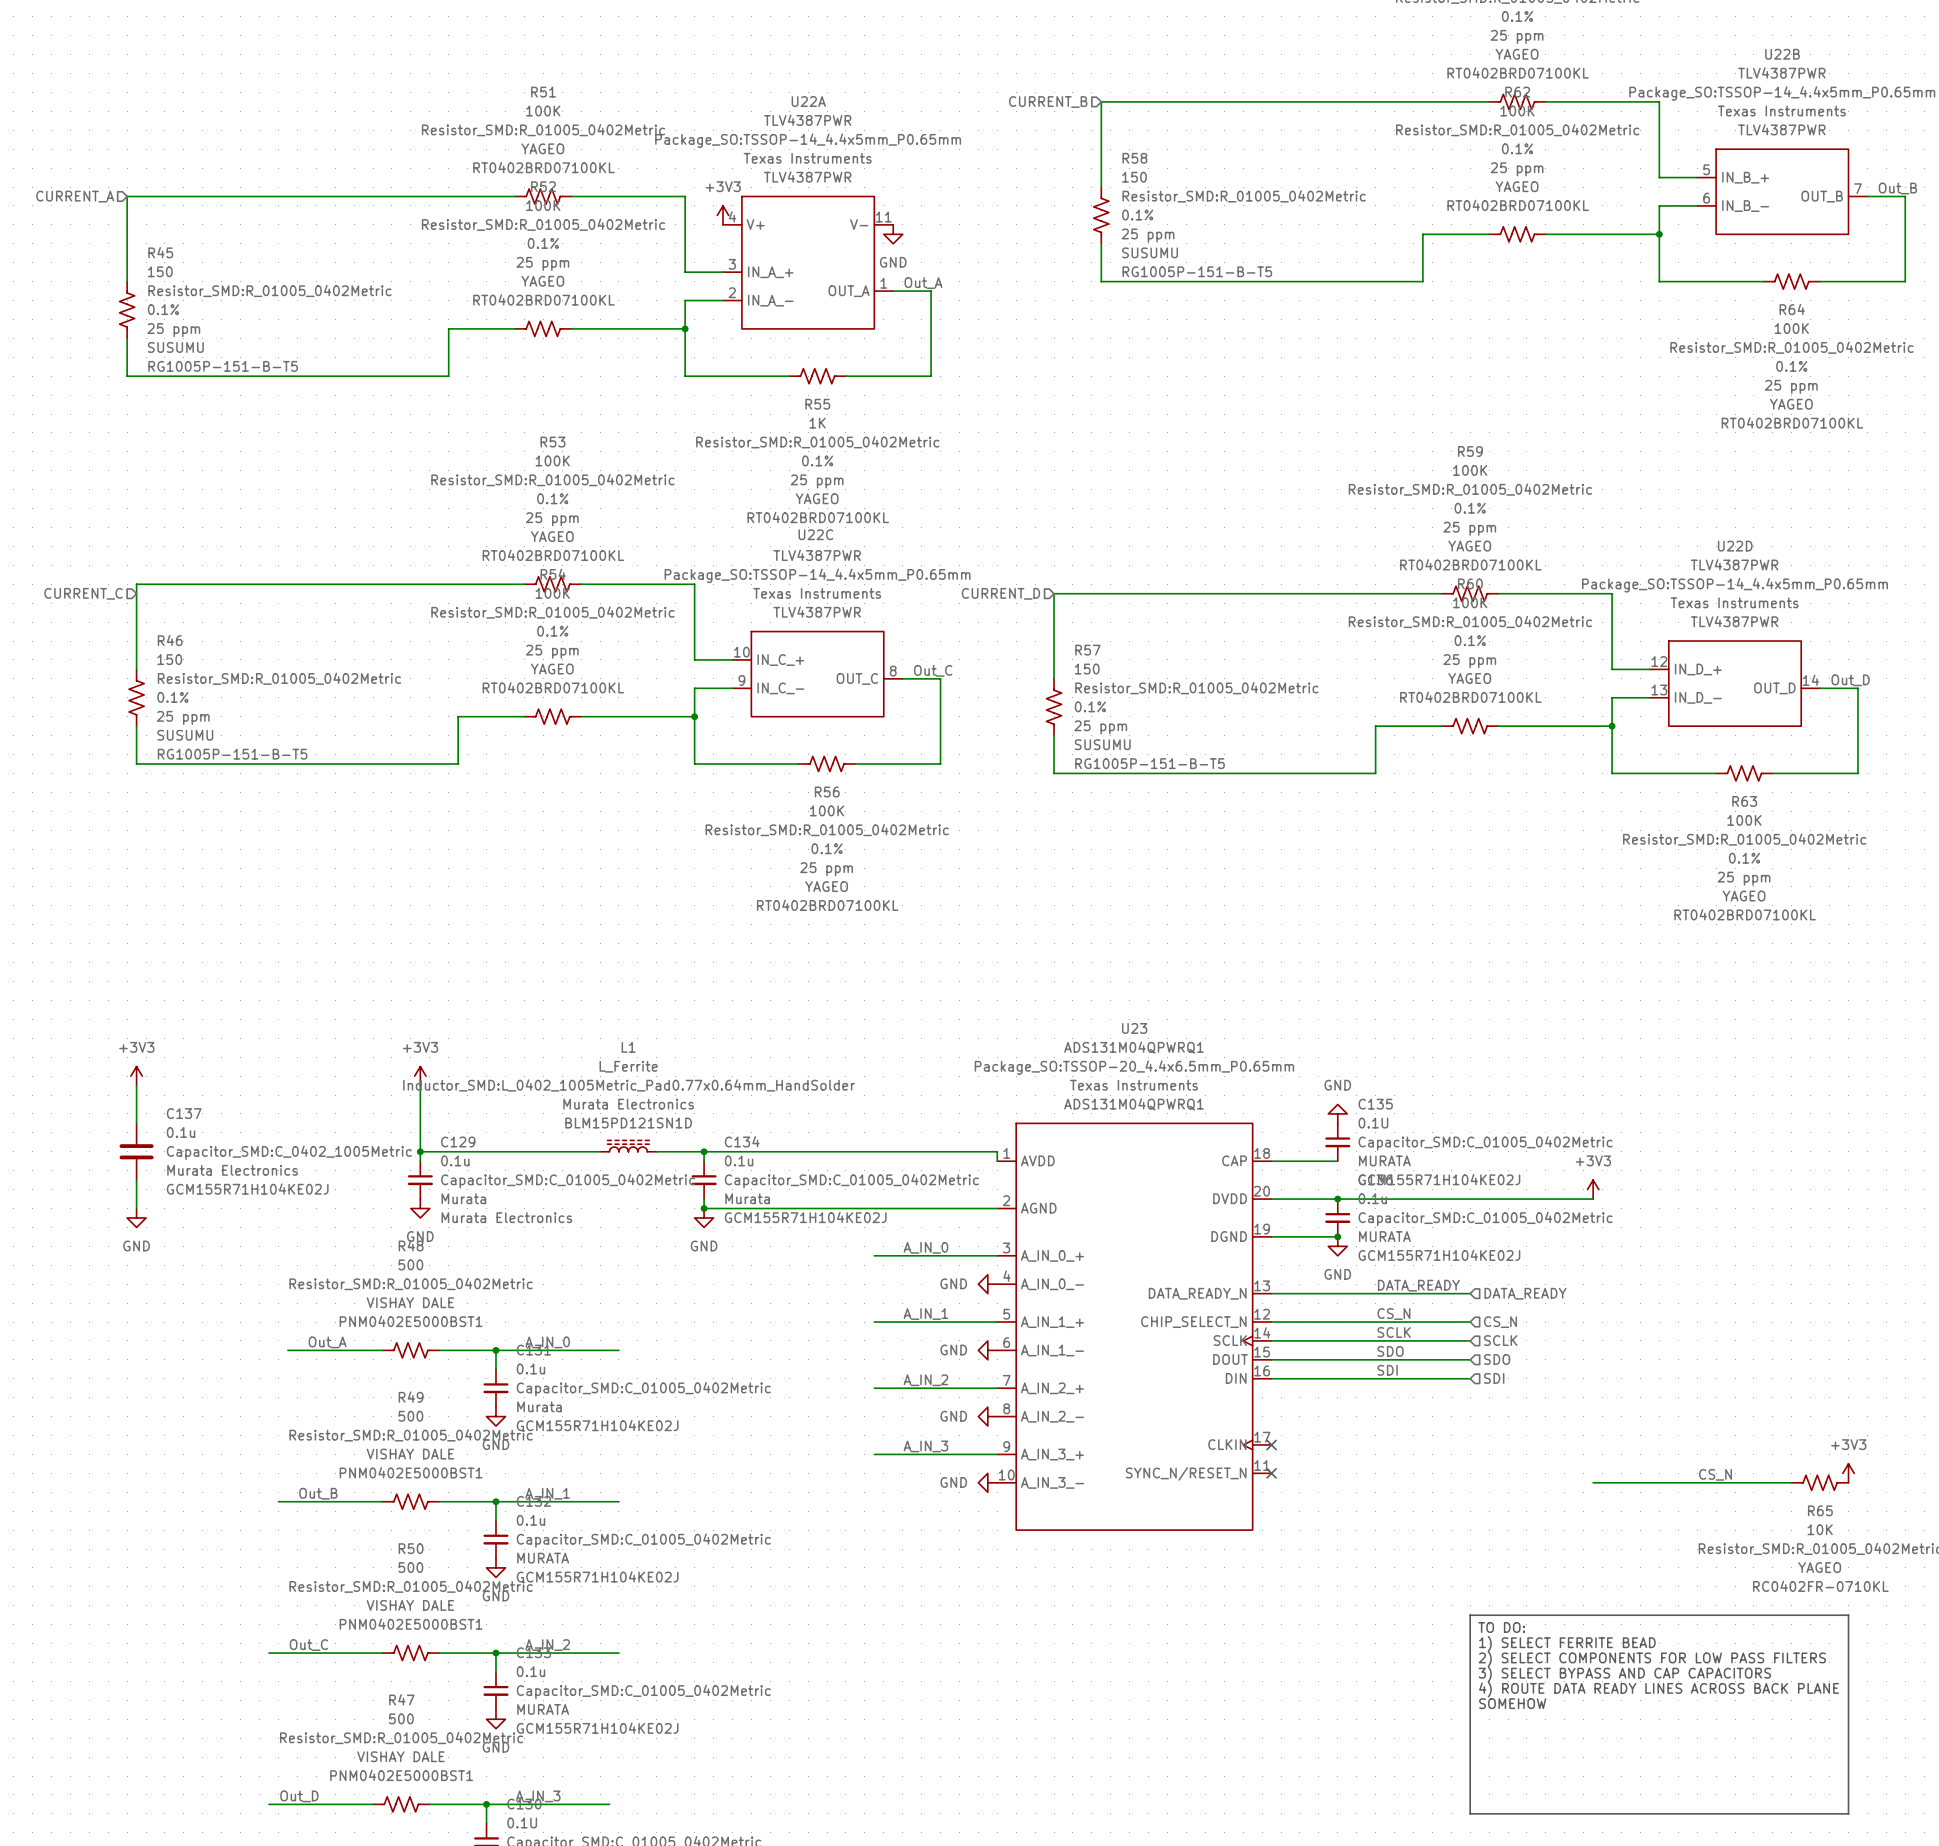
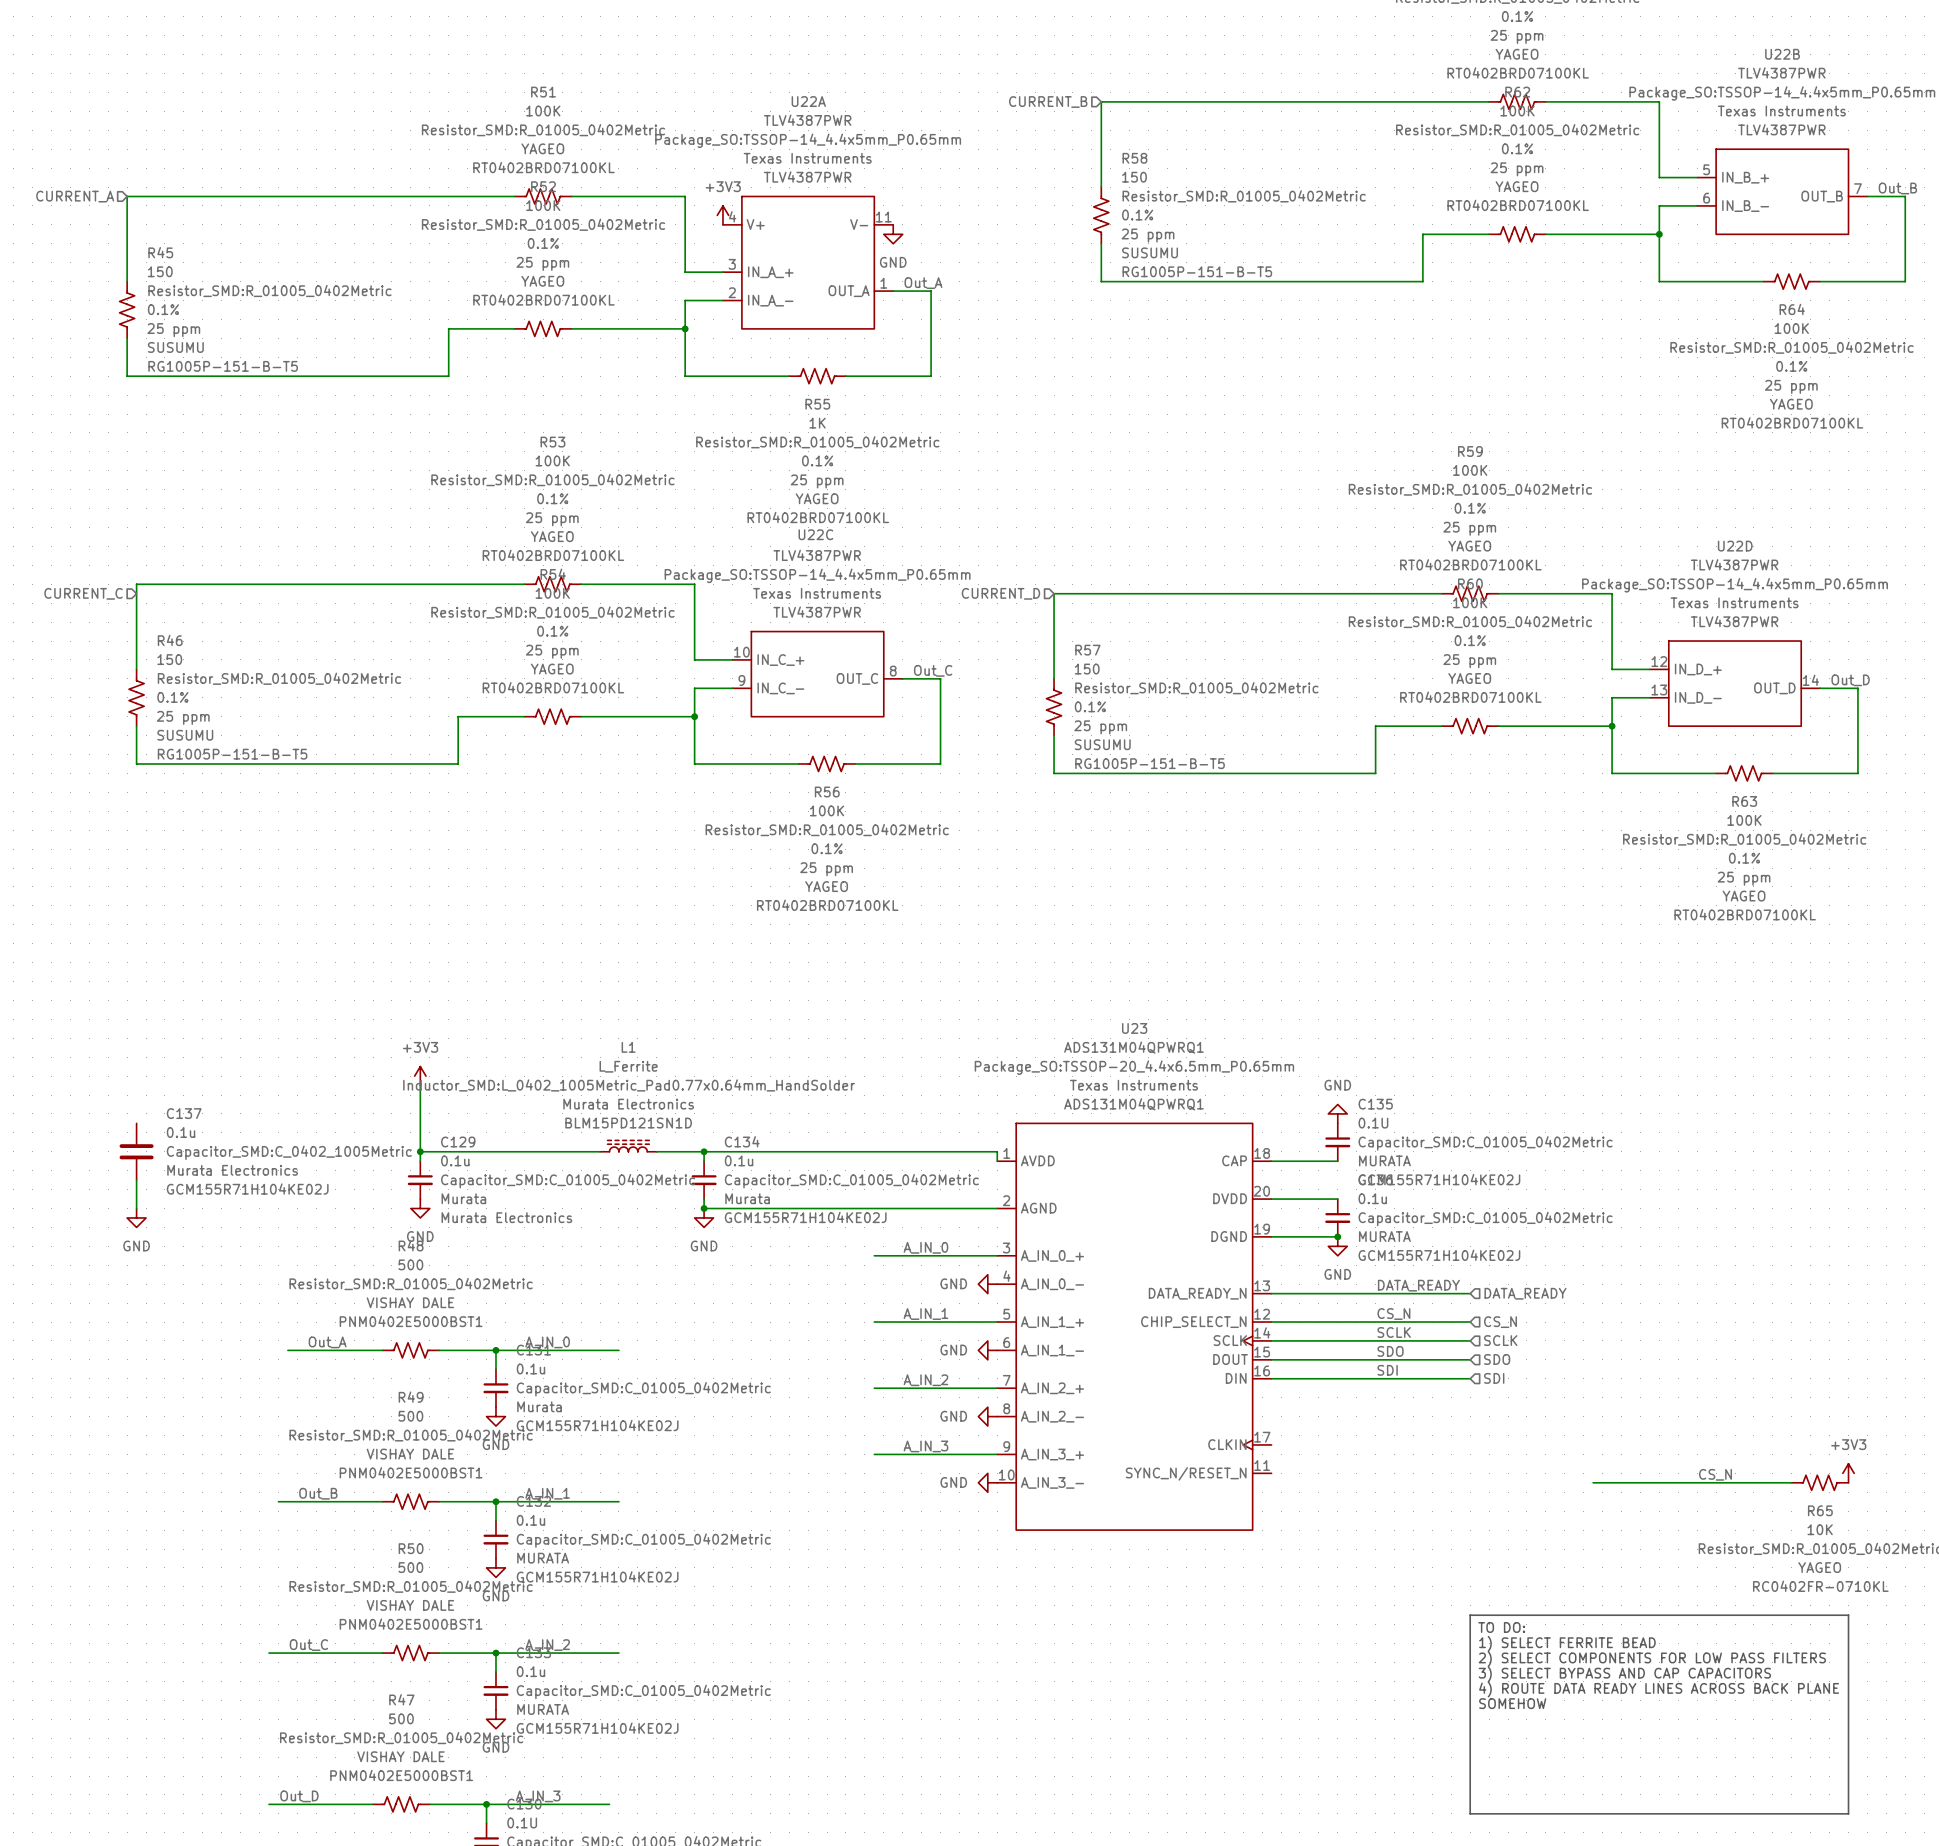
power symbol: +3V3 (136, 1076) -> none
wire: (136, 1085) (136, 1123) -> none
power symbol: +3V3 (1593, 1189) -> none
wire: (1337, 1199) (1593, 1199) -> none
junction: (1337, 1199) -> none
no-connect mark: (1271, 1444) -> none
no-connect mark: (1271, 1473) -> none

